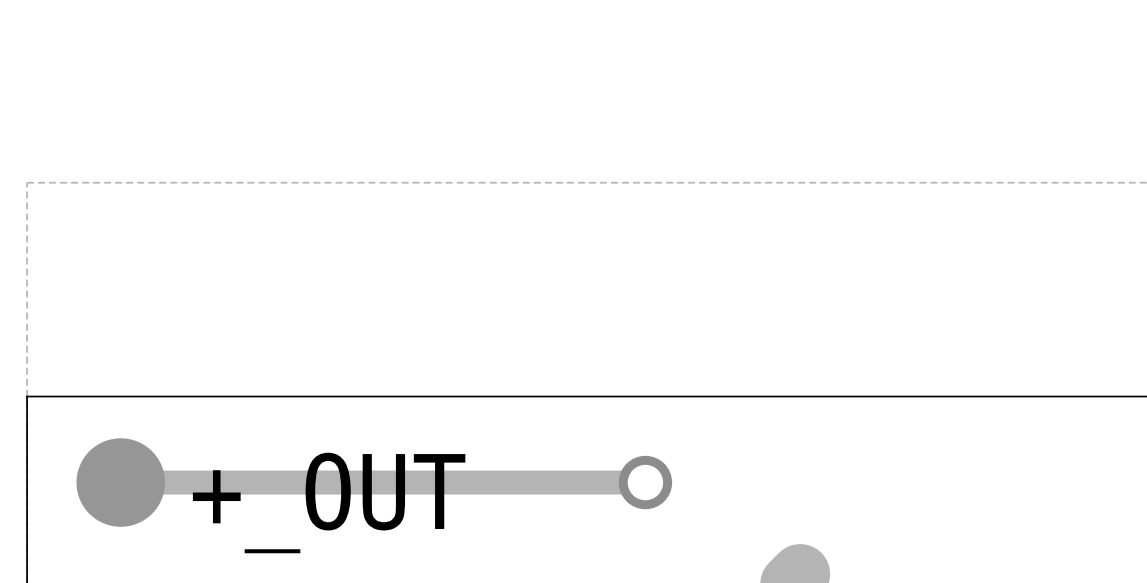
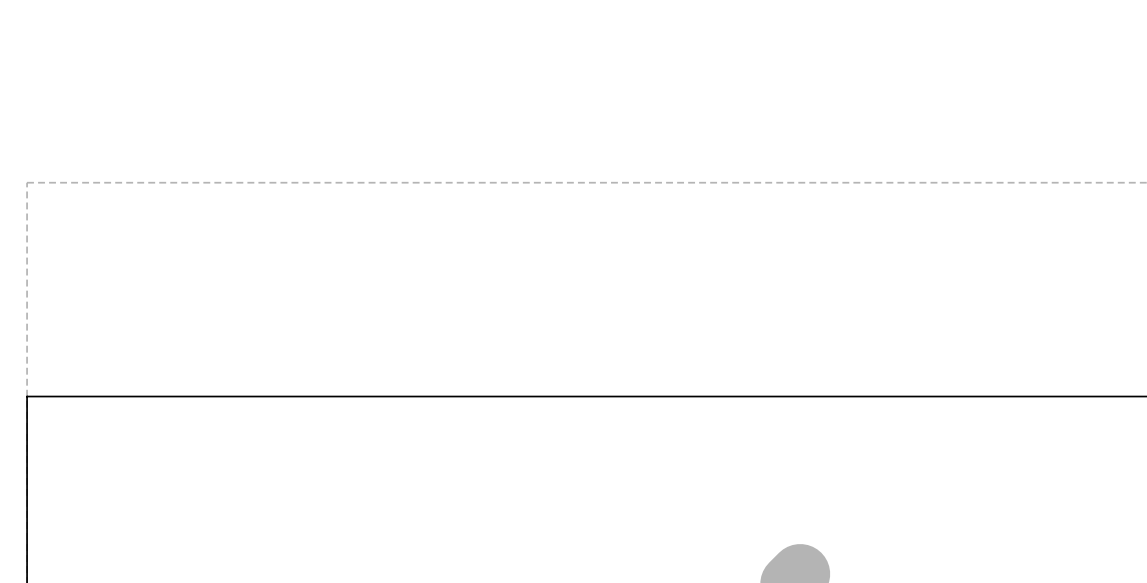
track: (120, 482) (645, 482) -> none
+_OUT: (120, 482) -> none
via: (645, 482) -> none

